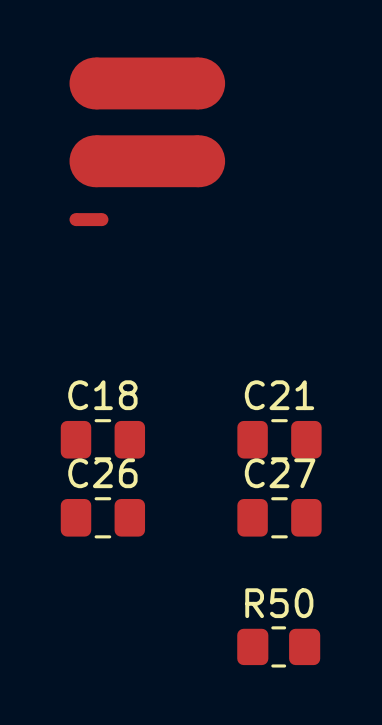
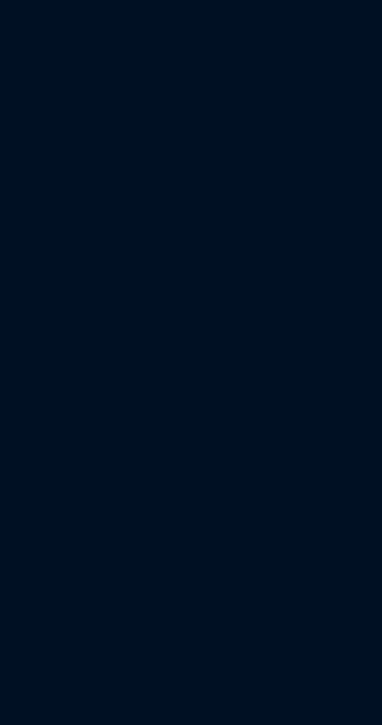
part: (147, 83) -> none
part: (147, 161) -> none
part: (88, 219) -> none
C18: (102, 439) -> none
C21: (279, 439) -> none
C26: (102, 517) -> none
C27: (279, 517) -> none
R50: (278, 646) -> none

